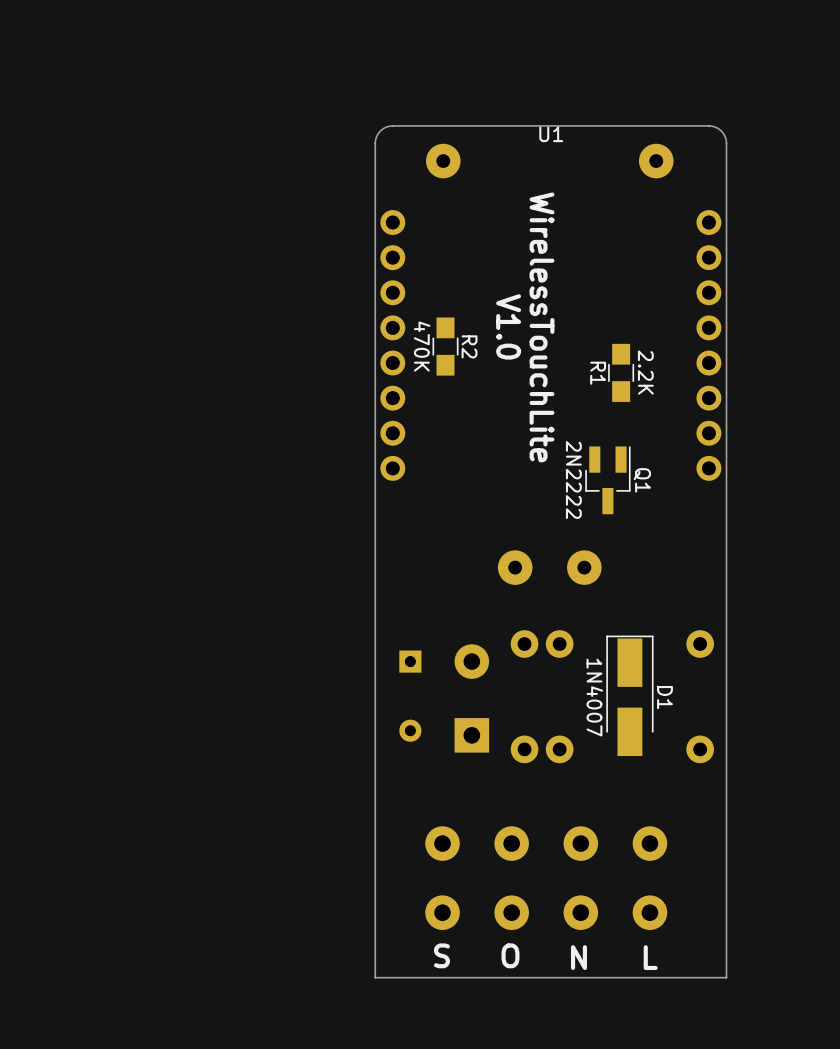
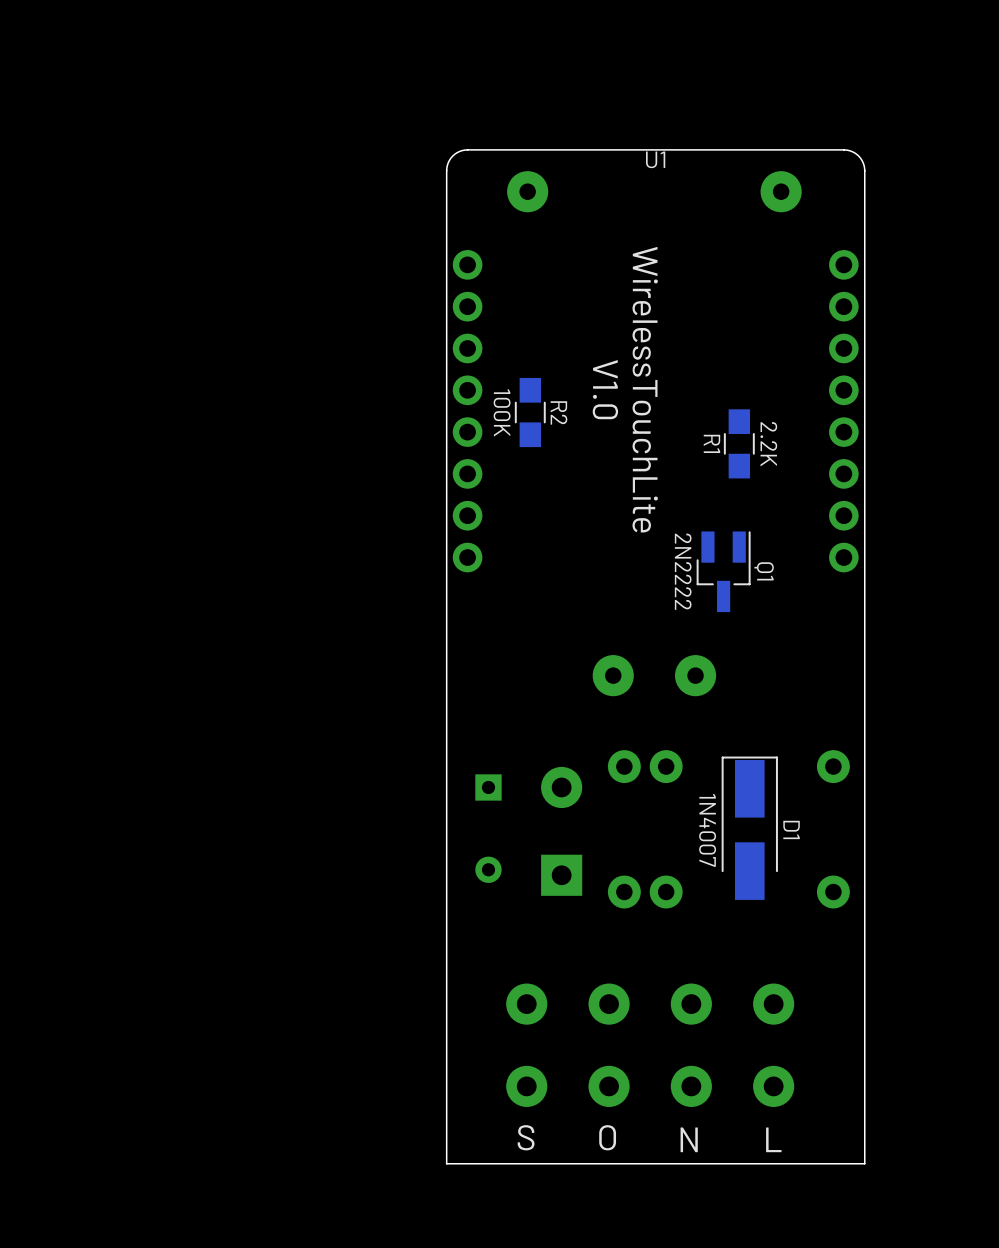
R2 value: 470K (422, 346) -> 100K (502, 412)

